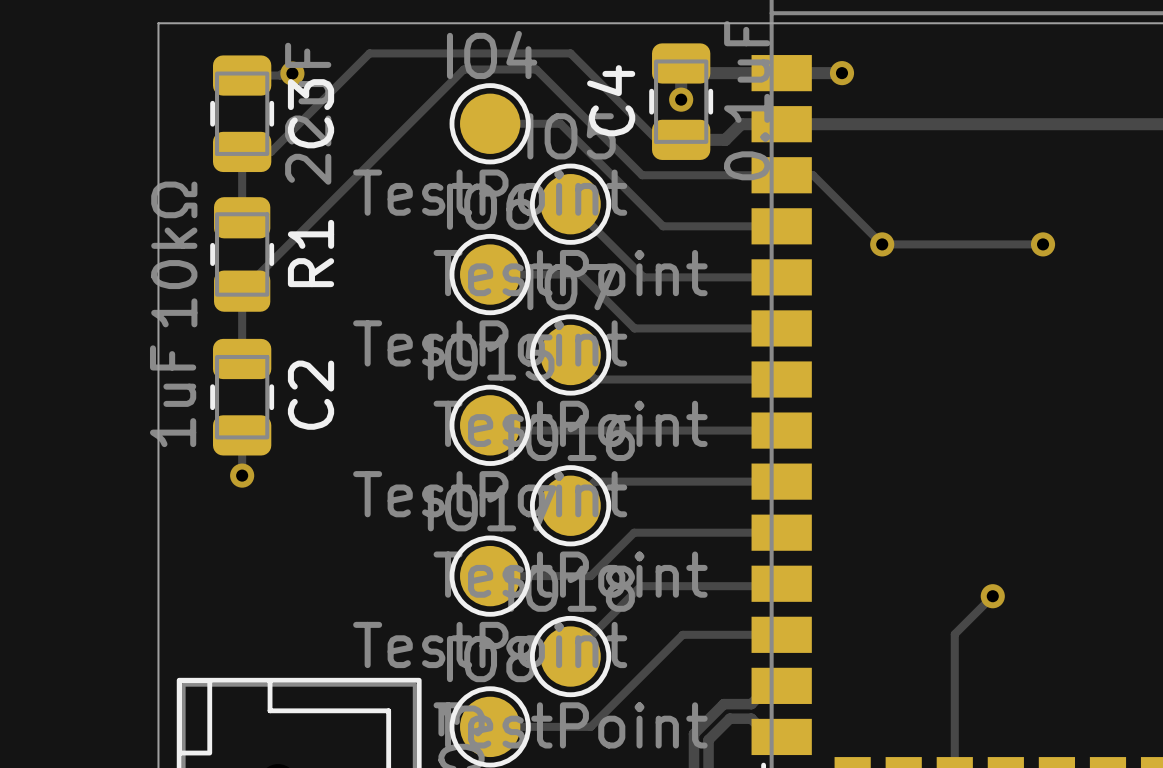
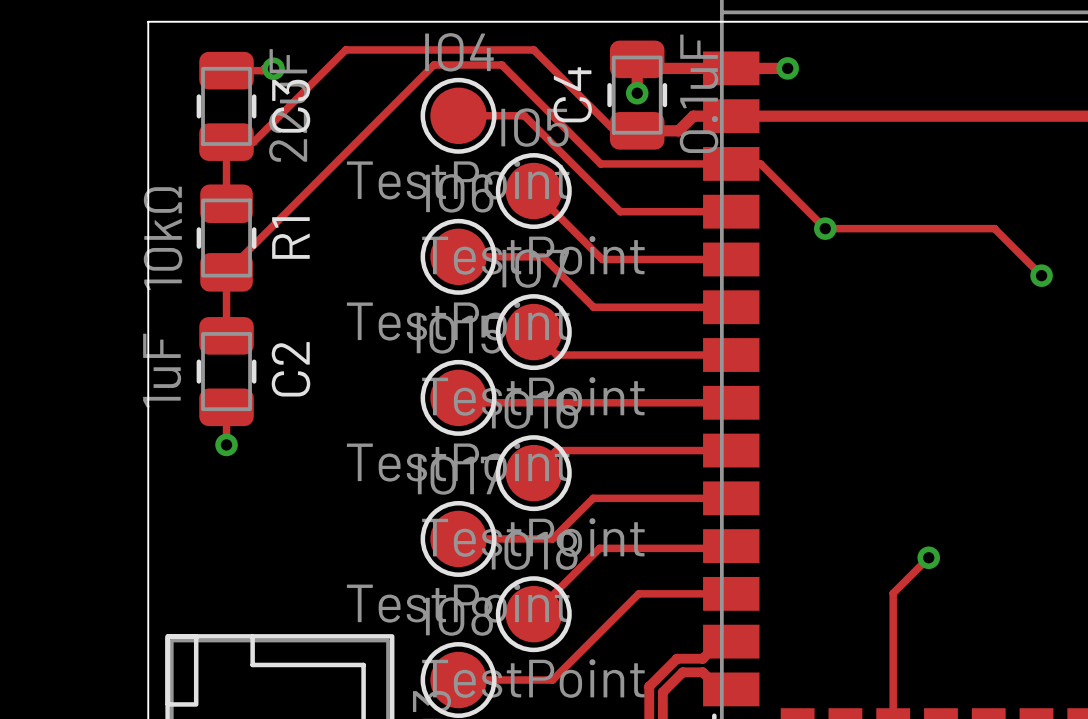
track: none -> (975, 228) (994, 228) (1041, 275)
via position: (1043, 244) -> (1041, 275)

